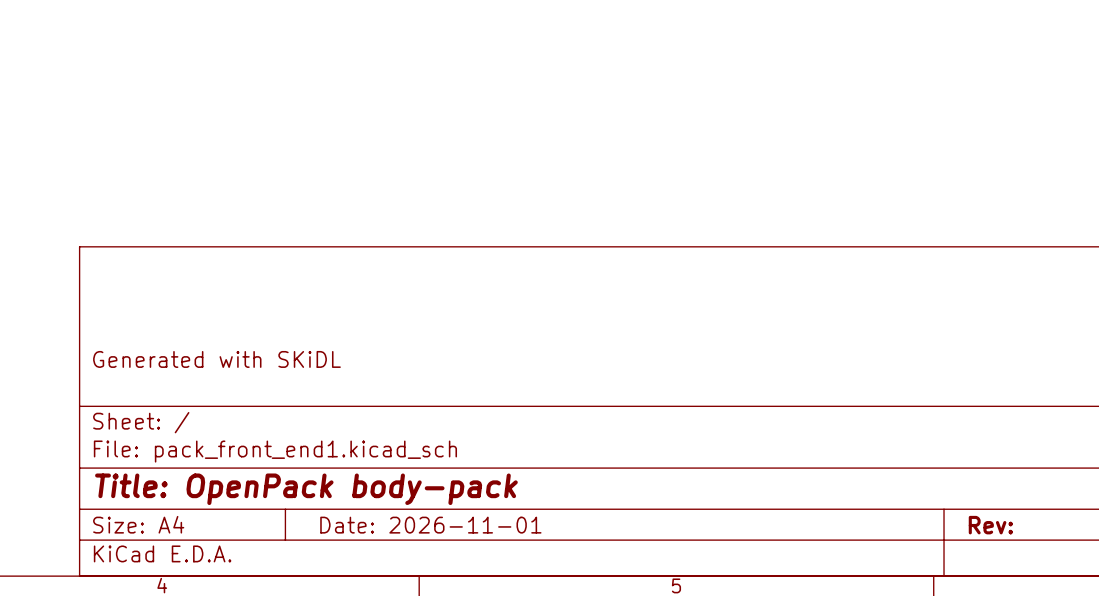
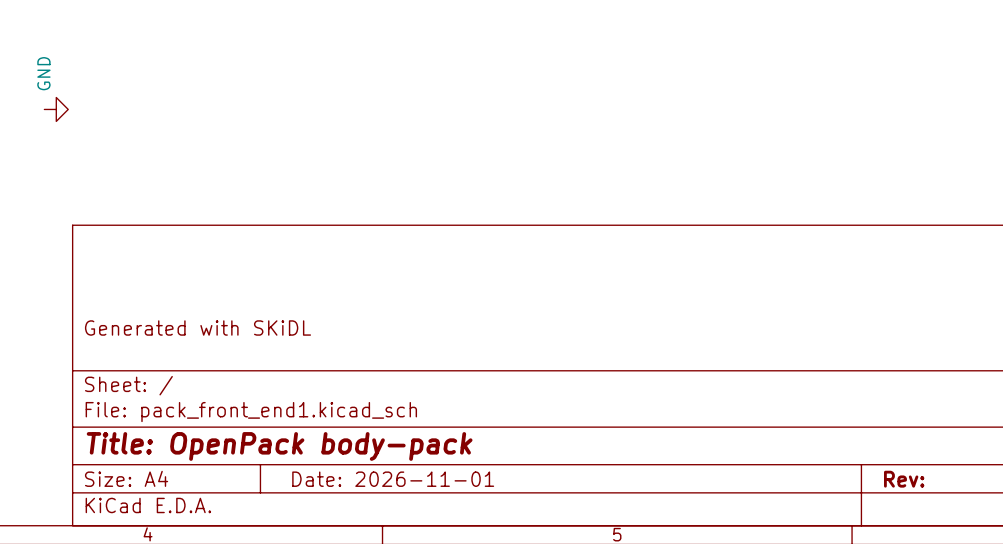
power symbol: none -> GND (56, 109)

